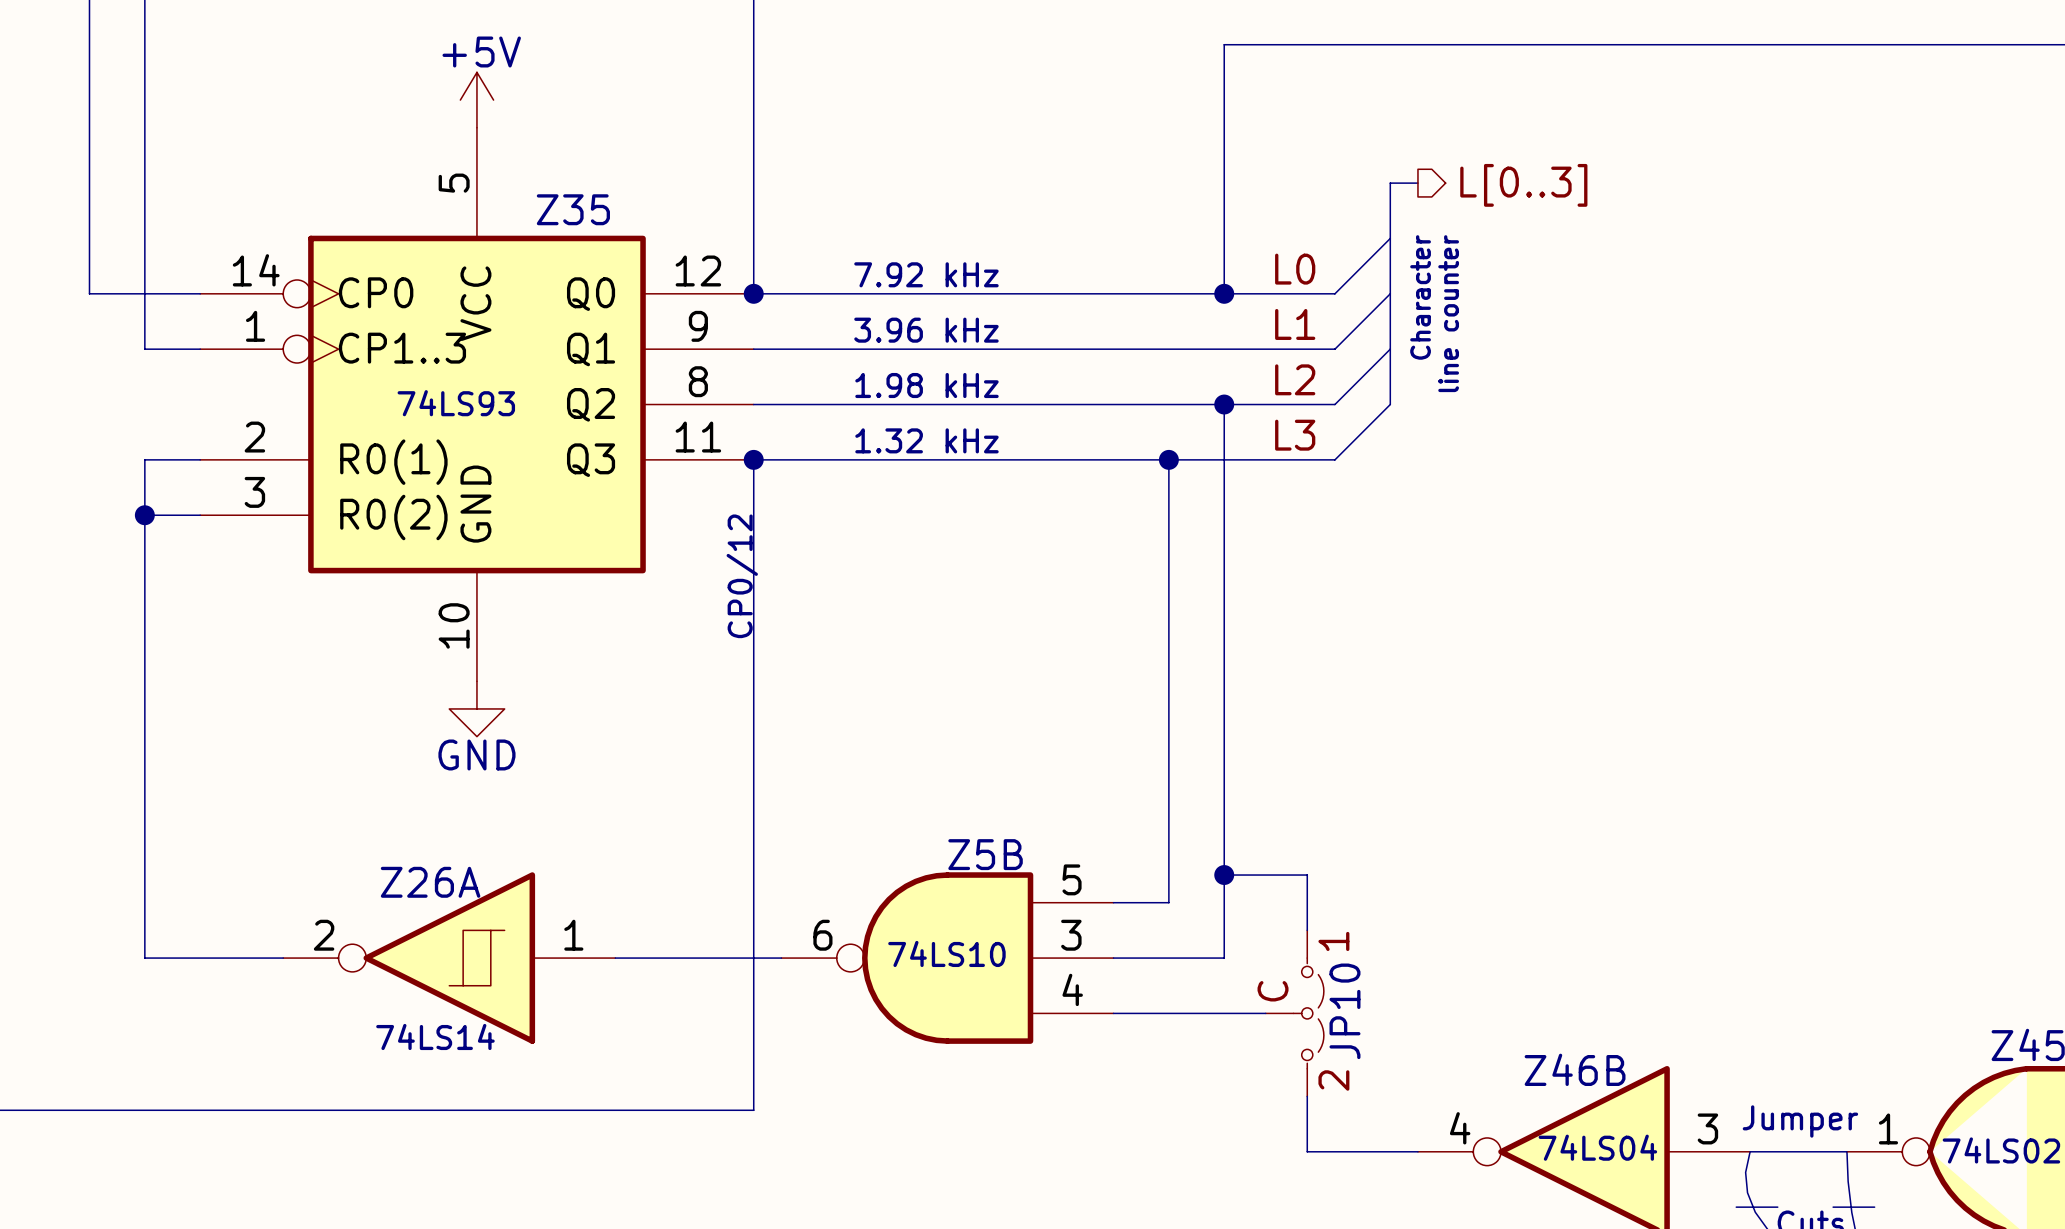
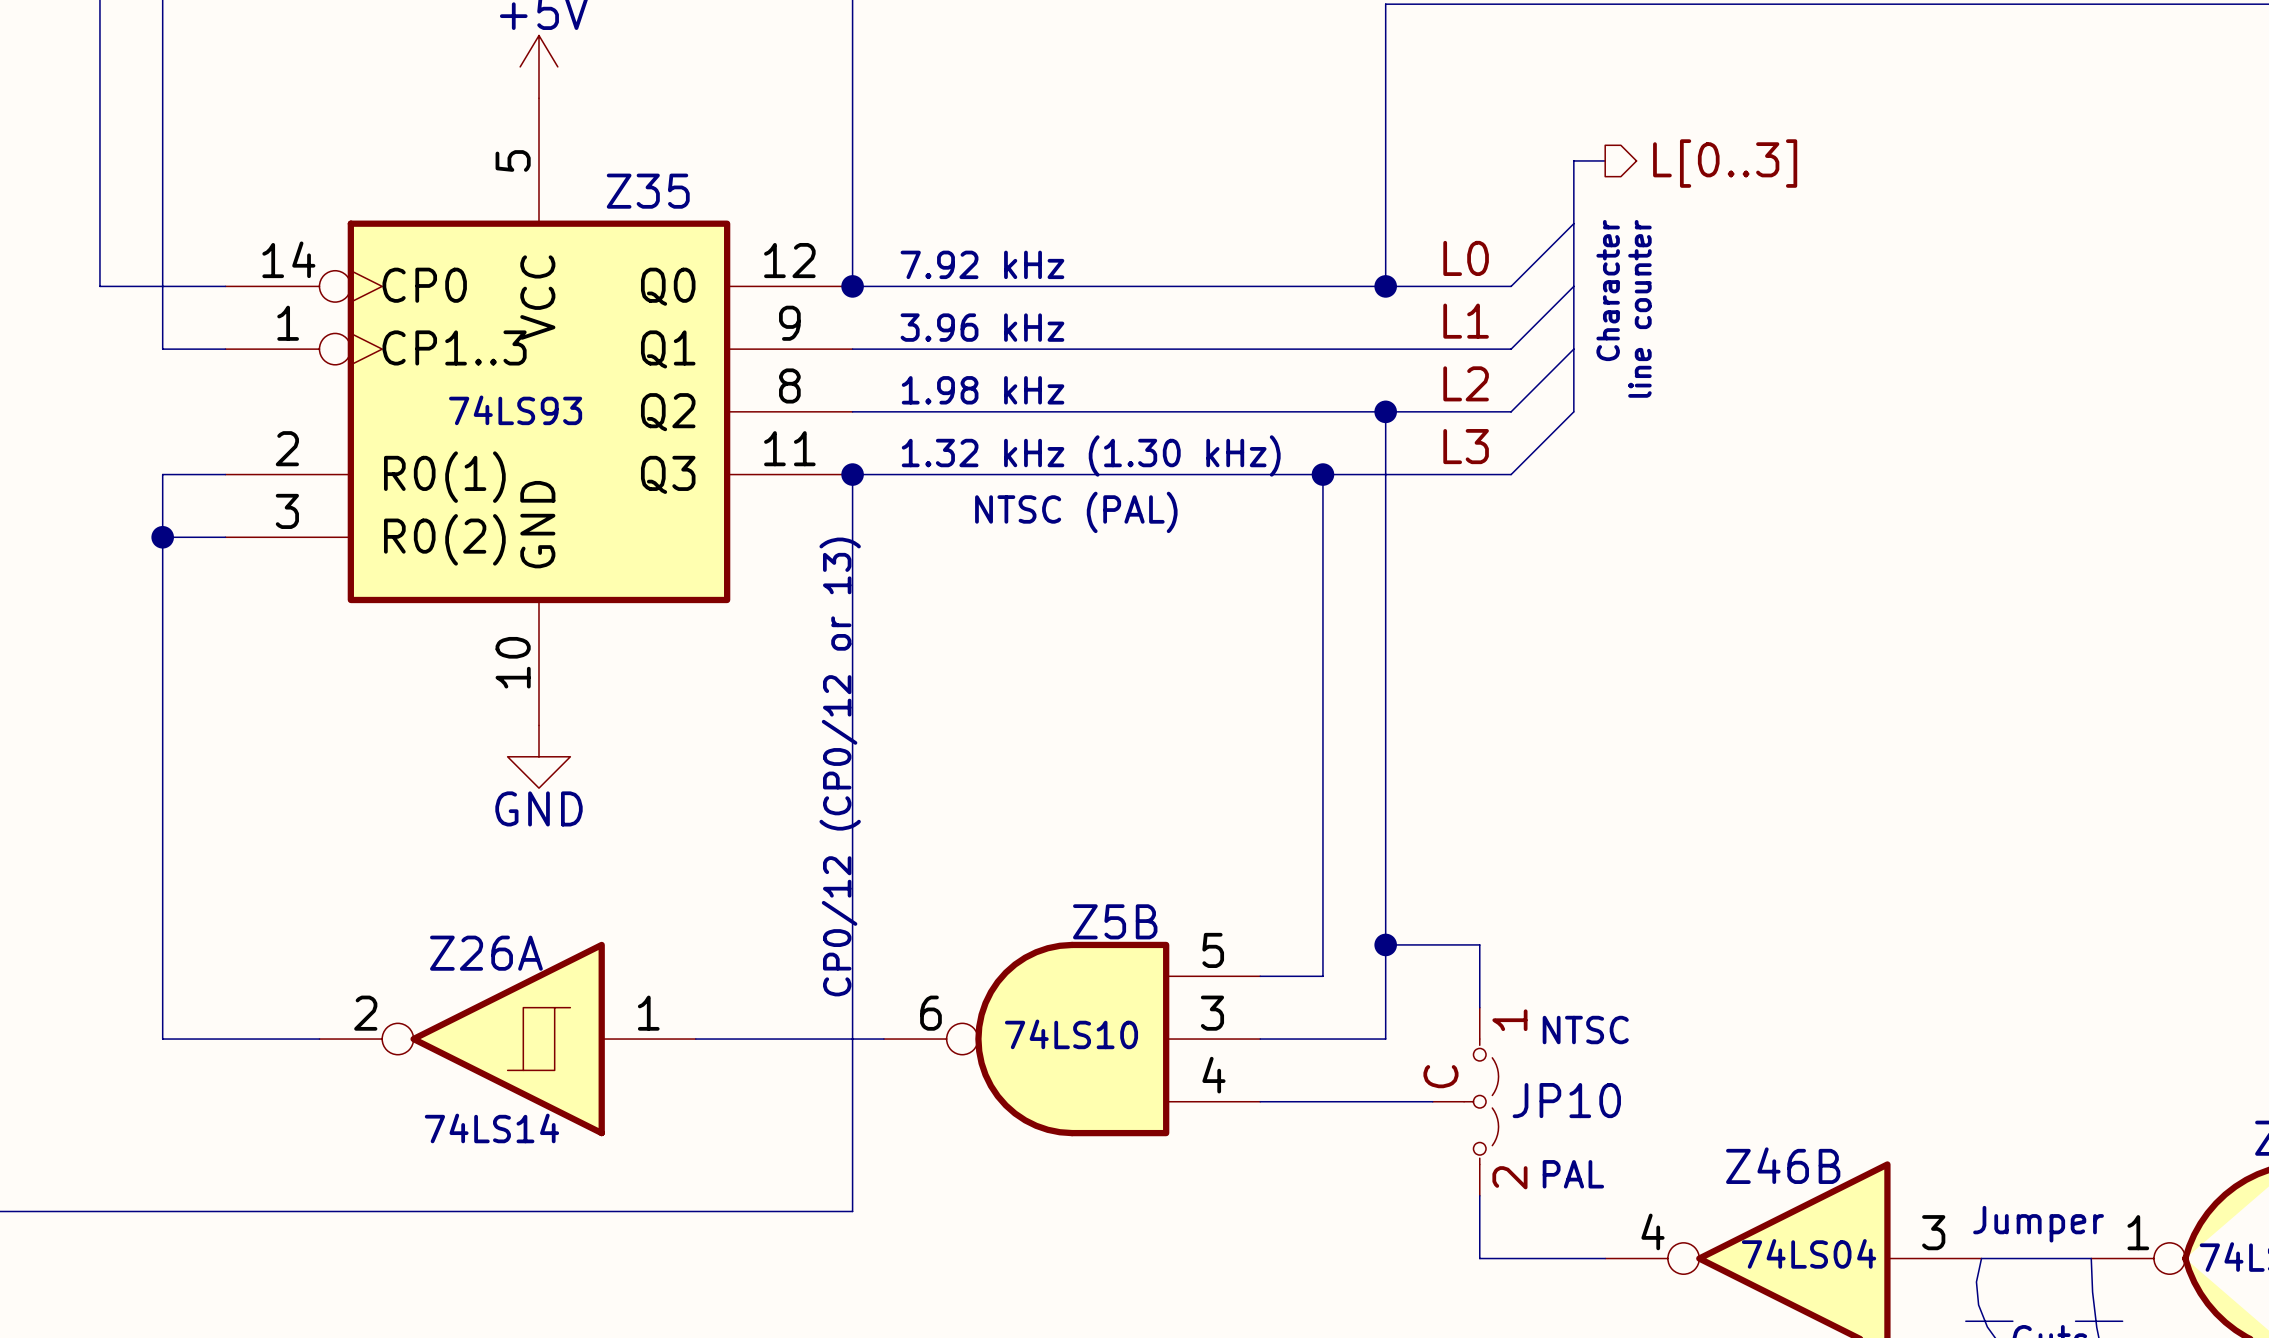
text position: 7.92 kHz (926, 274) -> 7.92 kHz (982, 264)
text position: 3.96 kHz (926, 330) -> 3.96 kHz (982, 327)
text position: 1.98 kHz (926, 385) -> 1.98 kHz (983, 390)
text: 1.32 kHz (926, 440) -> none
text: none -> 1.32 kHz (1.30 kHz) (1091, 455)
text: none -> NTSC (PAL) (1076, 512)
text: CP0/12 (742, 576) -> CP0/12 (CP0/12 or 13) (840, 766)
text: none -> NTSC (1585, 1030)
JP10 name rotation: 0° (1344, 1011) -> 90° clockwise (1566, 1100)
text: none -> PAL (1573, 1174)

